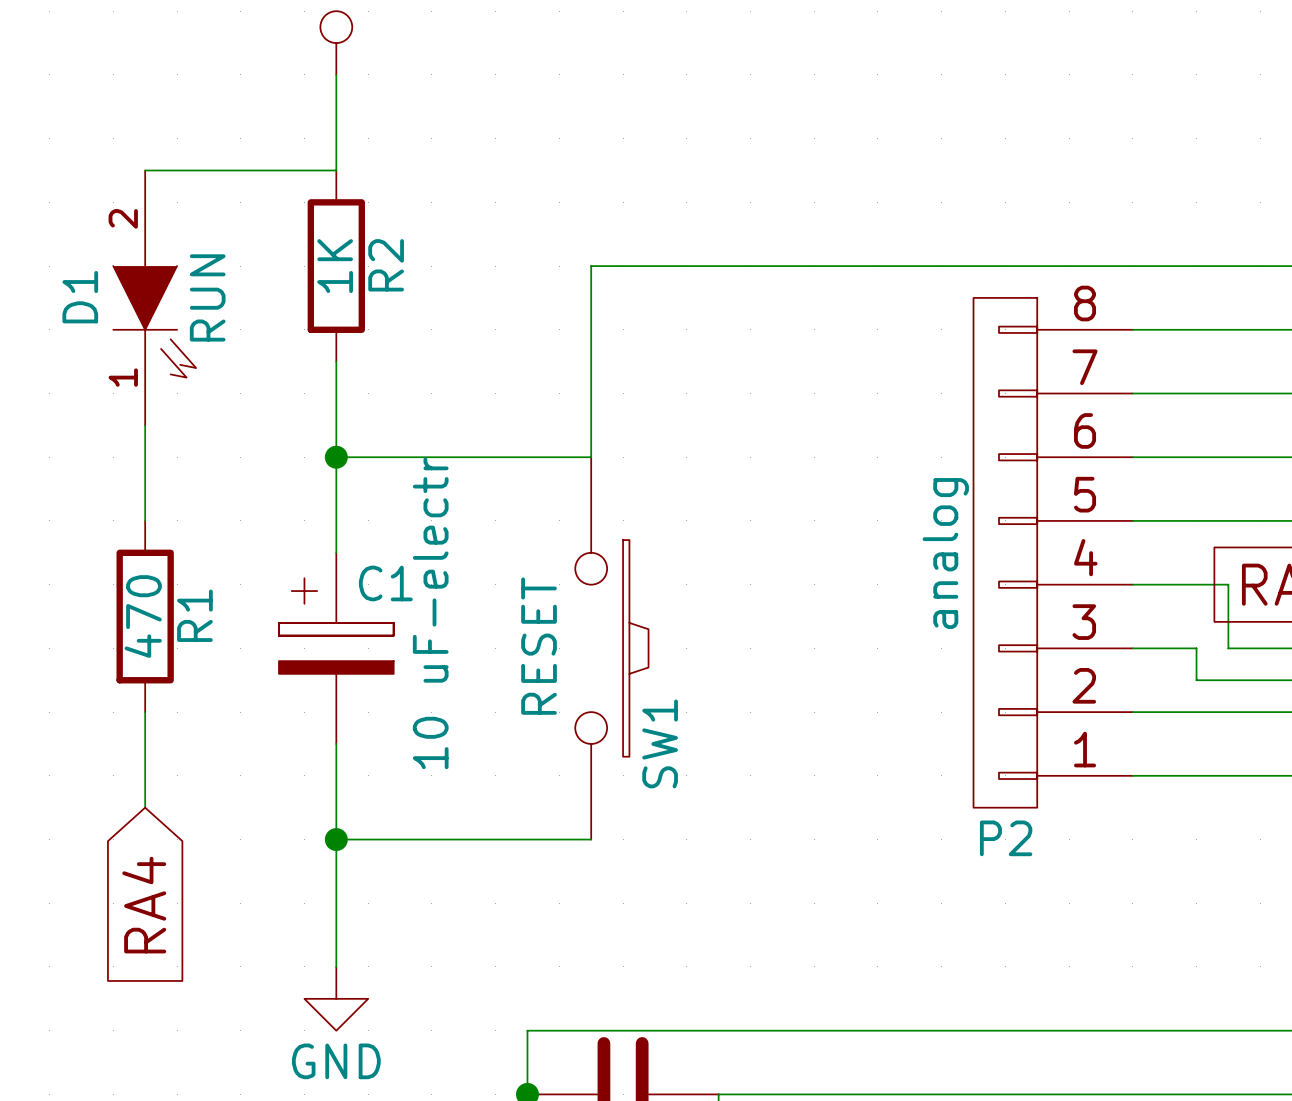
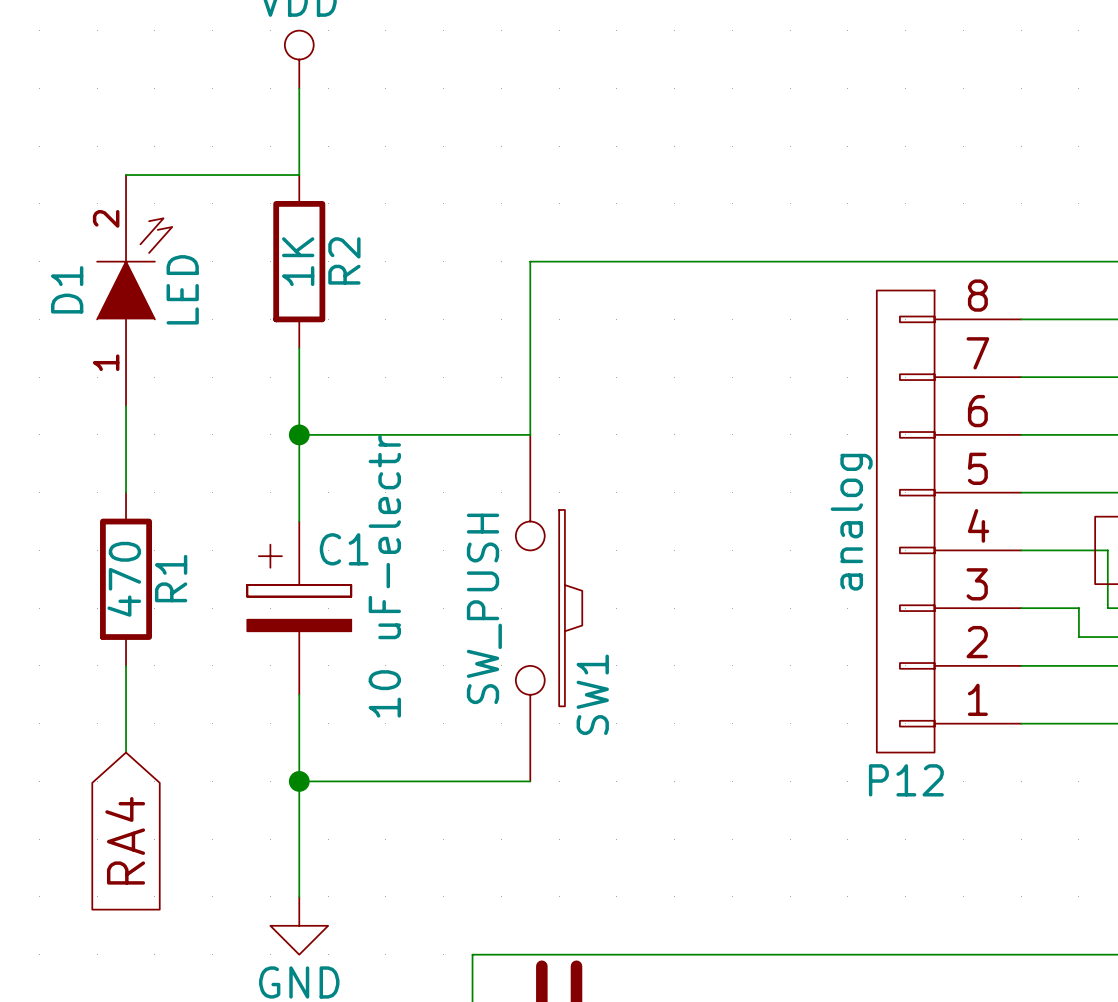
D1 symbol: [113, 170, 197, 426] -> [97, 175, 173, 407]
D1 value: RUN (207, 297) -> LED (182, 289)
SW1 value: RESET (539, 646) -> SW_PUSH (484, 608)
P2 name: P2 (1006, 838) -> P12 (906, 780)

